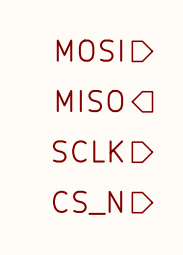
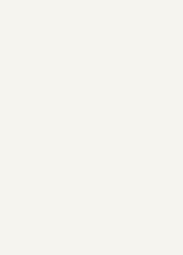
hierarchical label: MOSI (89, 50) -> none
hierarchical label: MISO (89, 101) -> none
hierarchical label: SCLK (88, 151) -> none
hierarchical label: CS_N (87, 202) -> none

